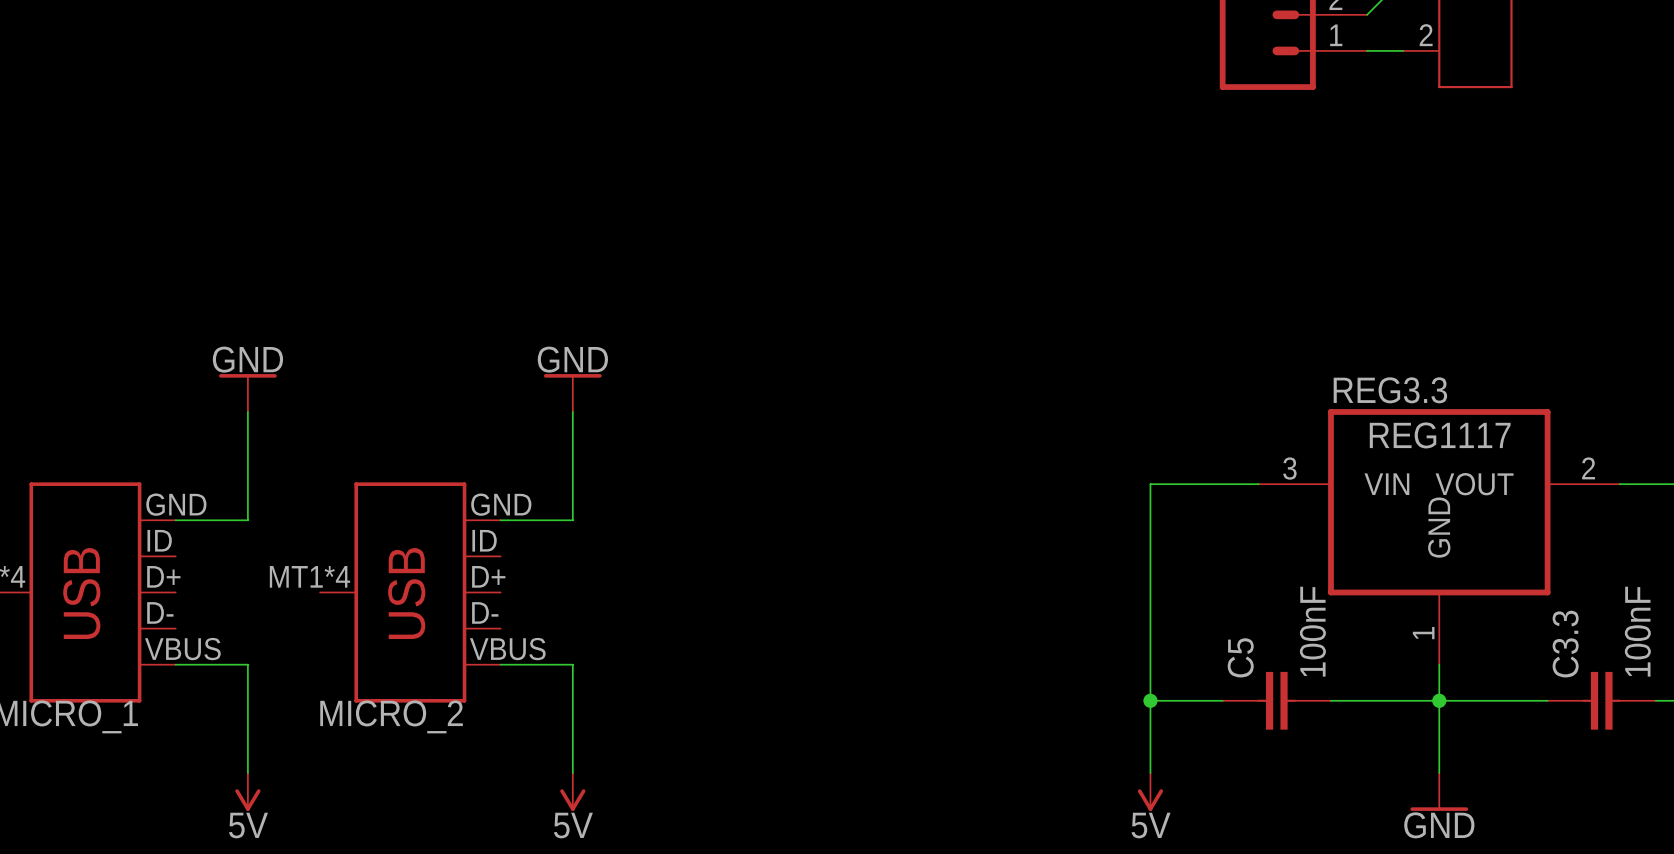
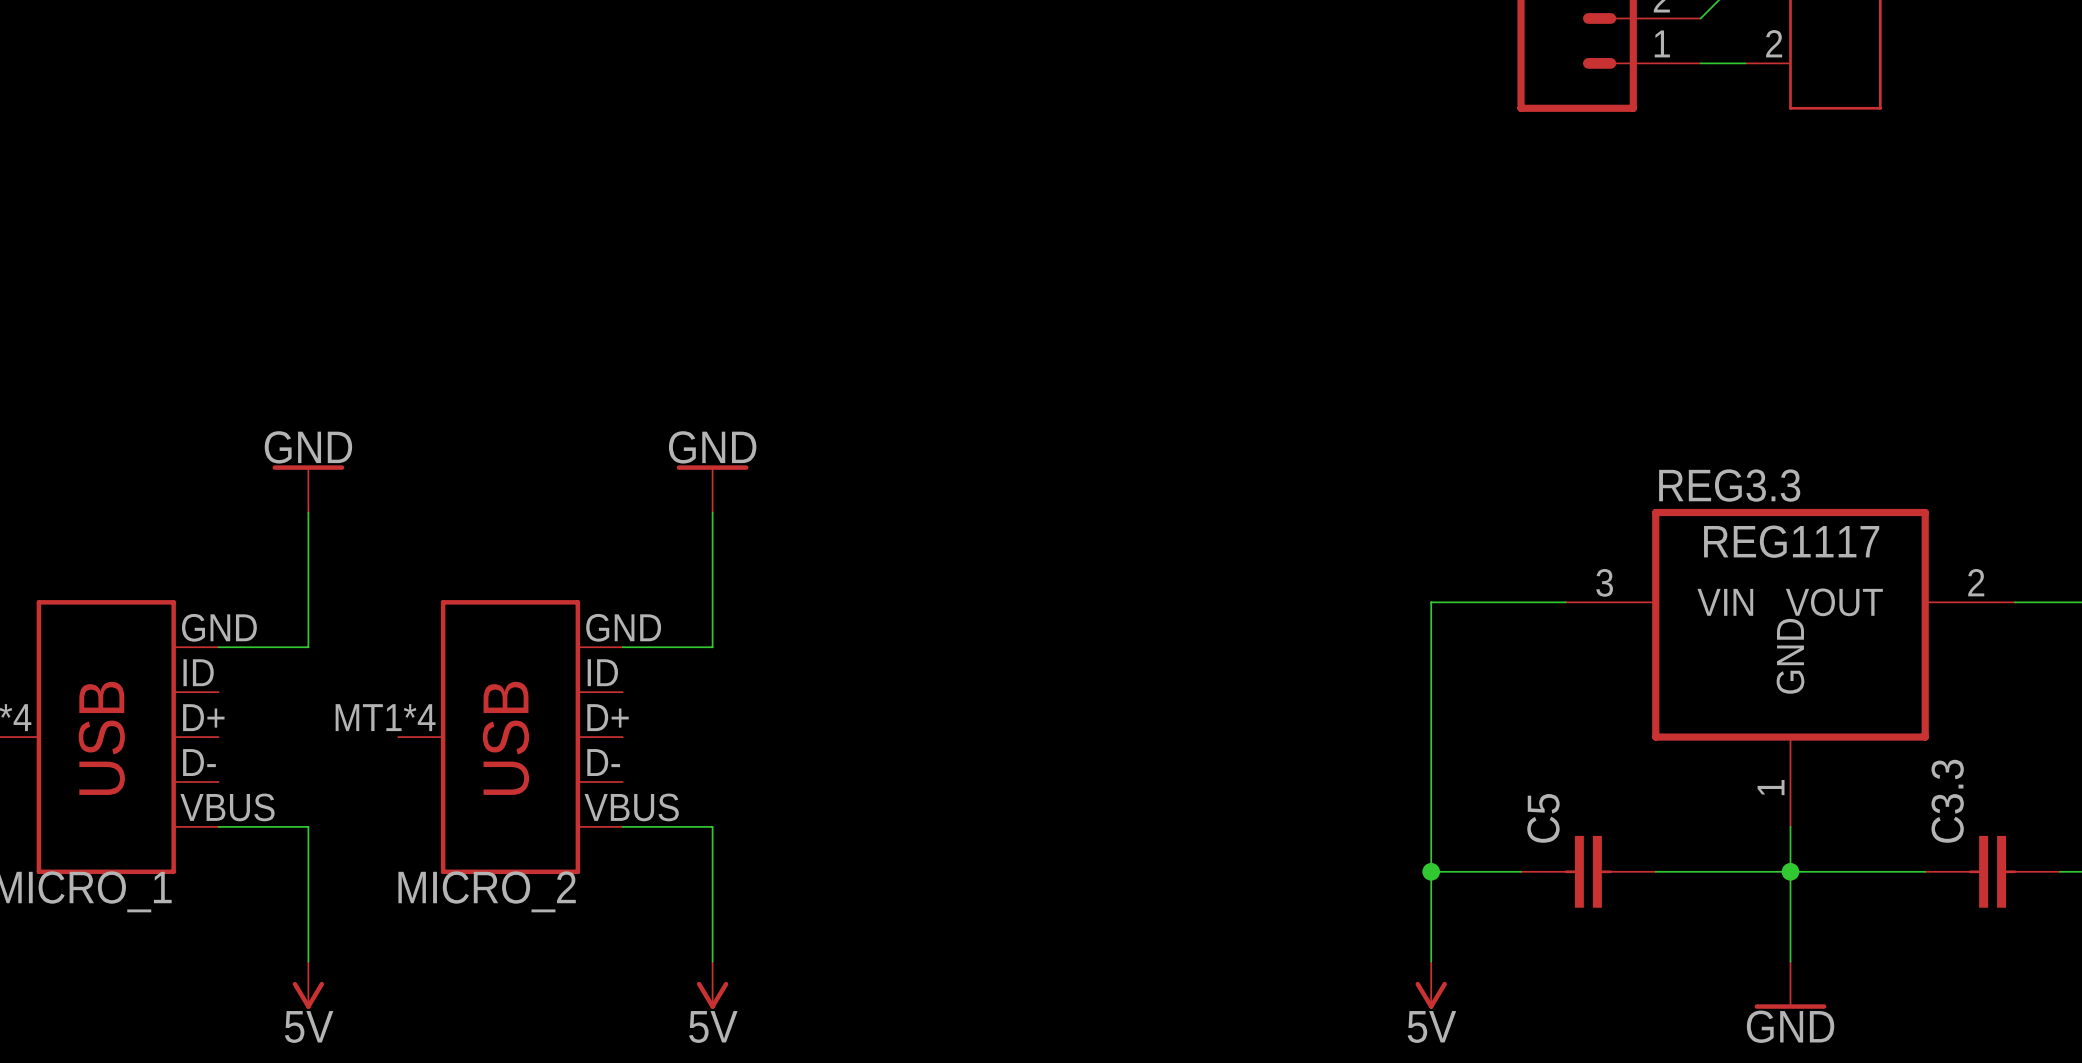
C5 value: 100nF (1312, 631) -> none
C3.3 value: 100nF (1637, 631) -> none

